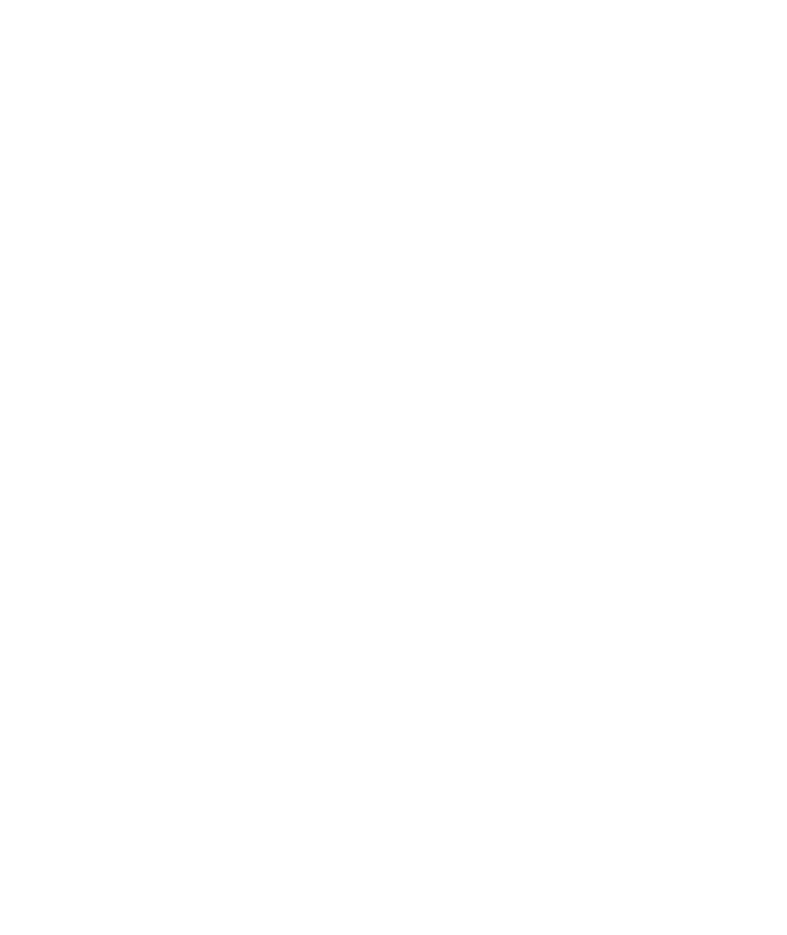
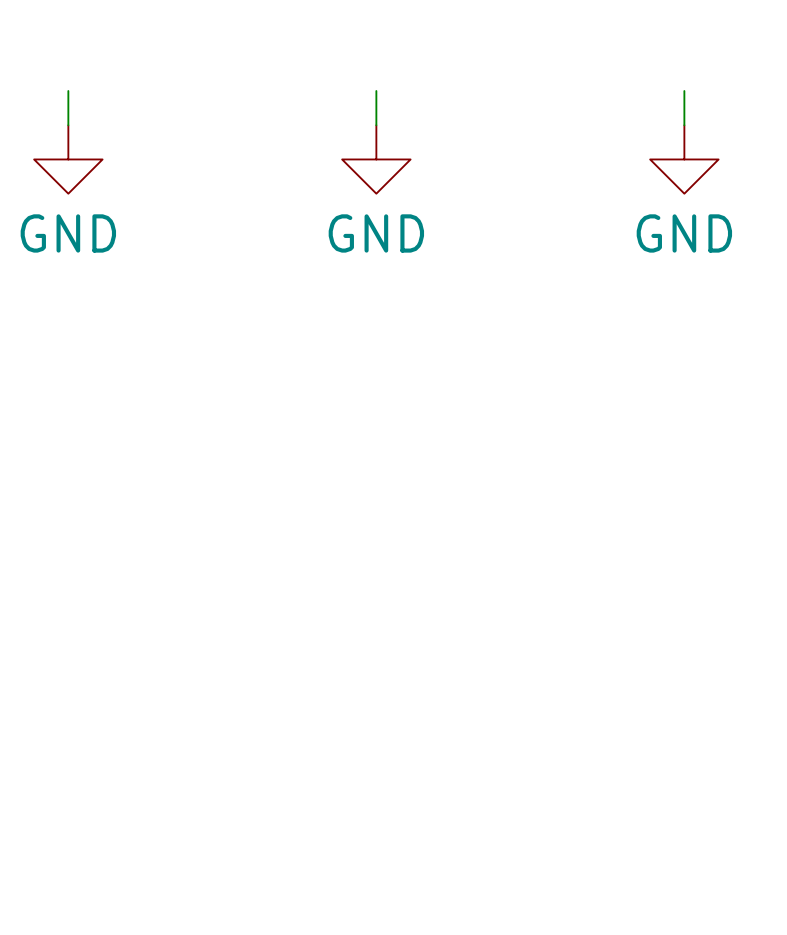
wire: none -> (68, 91) (68, 125)
wire: none -> (376, 91) (376, 125)
wire: none -> (684, 91) (684, 125)
power symbol: none -> GND (68, 159)
power symbol: none -> GND (376, 159)
power symbol: none -> GND (684, 159)

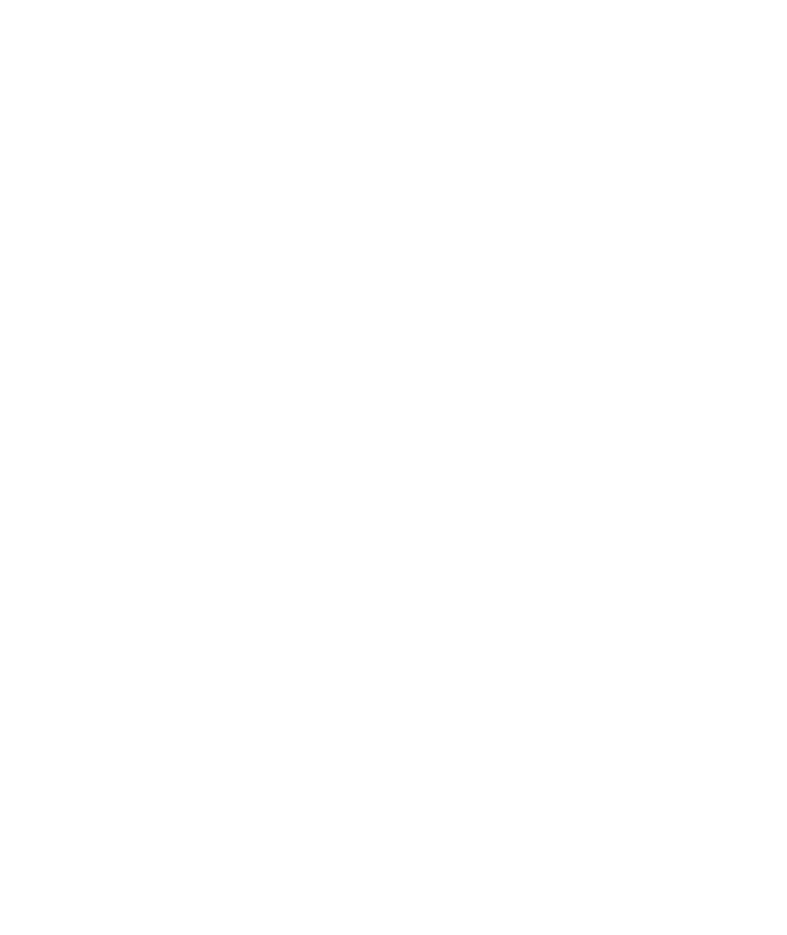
wire: (68, 91) (68, 125) -> none
wire: (376, 91) (376, 125) -> none
wire: (684, 91) (684, 125) -> none
power symbol: GND (68, 159) -> none
power symbol: GND (376, 159) -> none
power symbol: GND (684, 159) -> none

